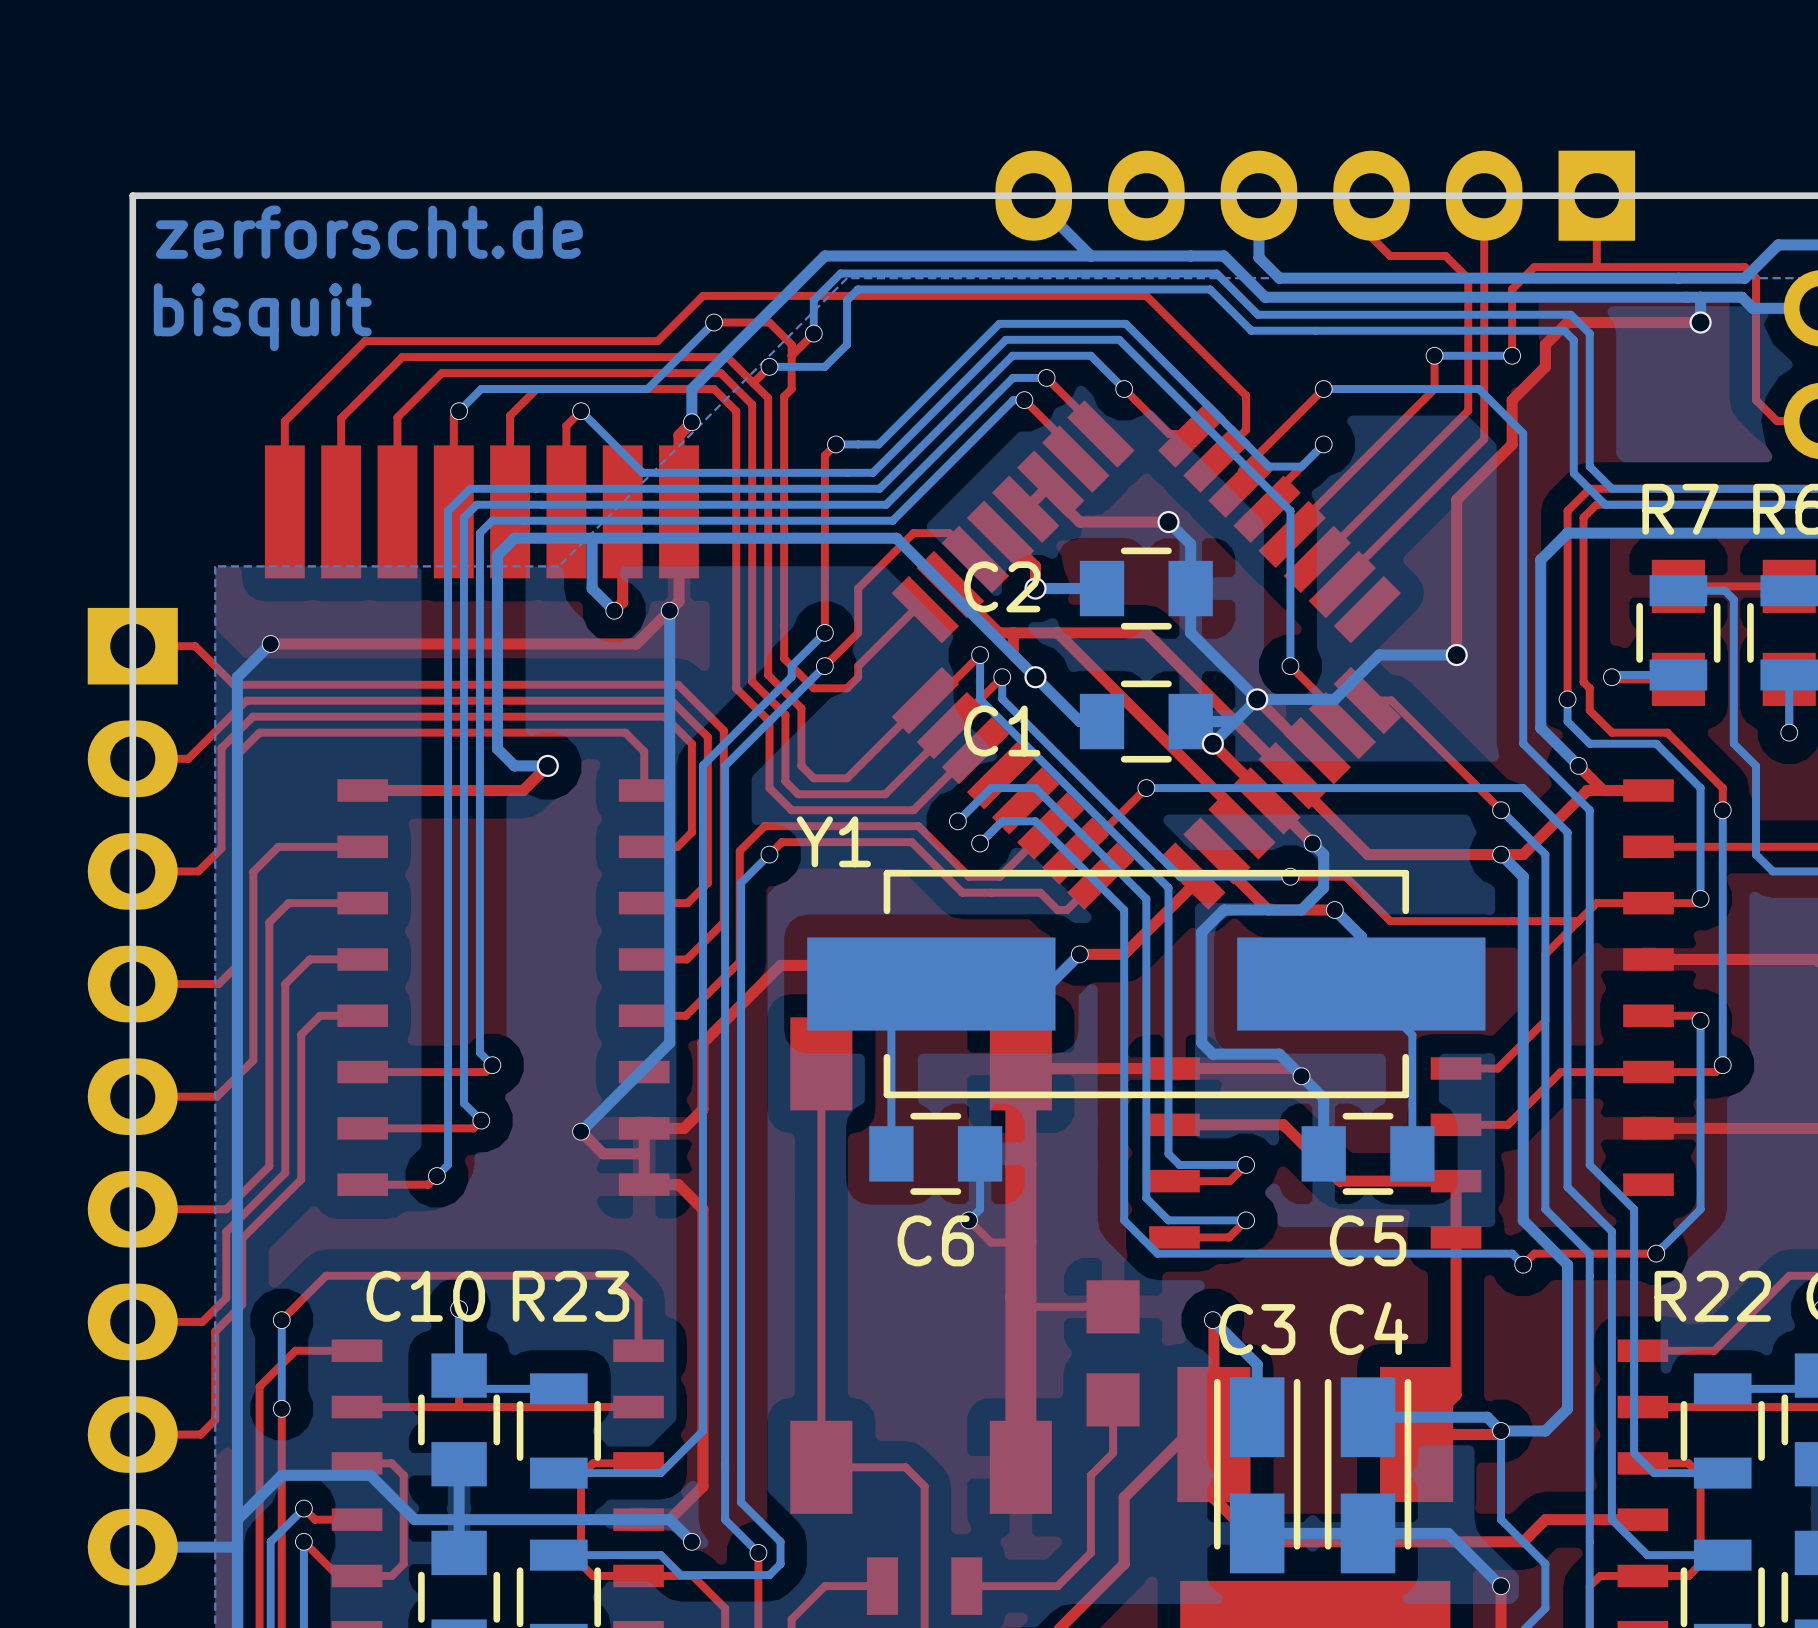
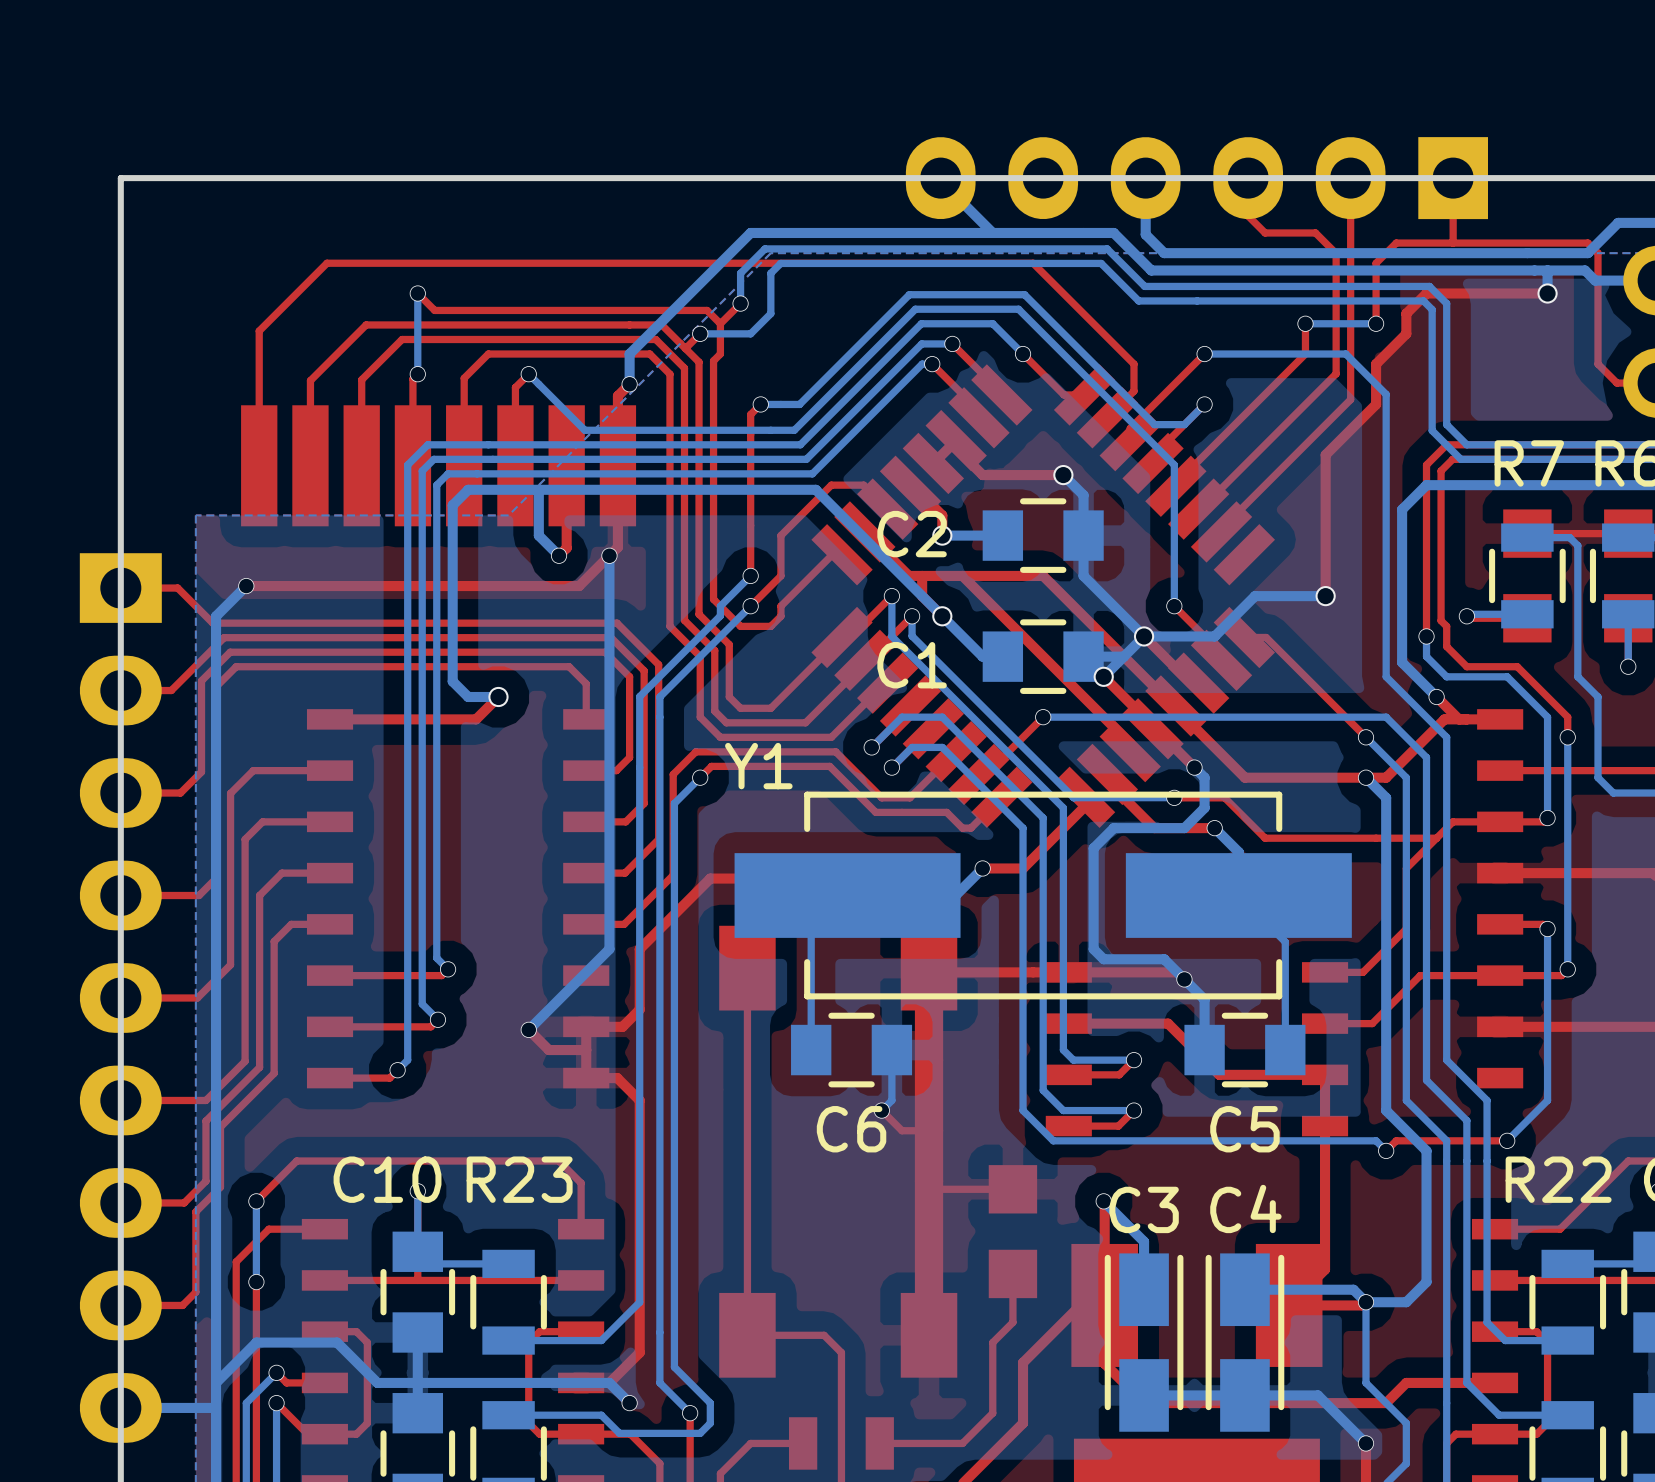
text: zerforscht.de (369, 232) -> none
text: bisquit (262, 317) -> none
top track: (714, 322) (769, 322) (791, 344) (791, 355) -> (598, 310) (707, 310) (720, 323)
bottom track: (714, 322) (647, 389) (481, 389) (459, 411) -> (417, 293) (417, 374)
via position: (714, 322) -> (417, 293)
top track: (477, 341) (365, 341) (284, 421) -> (434, 310) (417, 293)
top track: (657, 341) (702, 295) (1146, 295) (1246, 395) (1246, 400) -> (259, 383) (259, 331) (327, 263) (1033, 263) (1133, 364)

